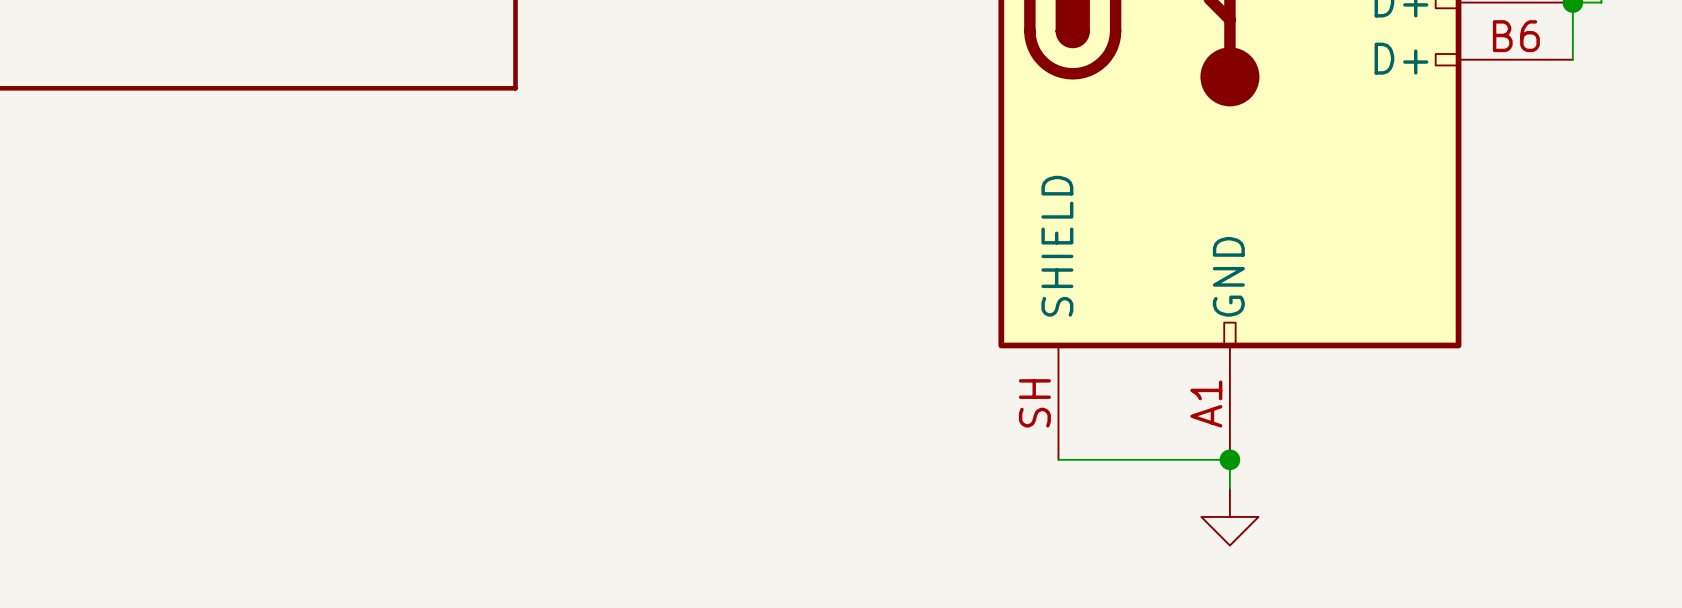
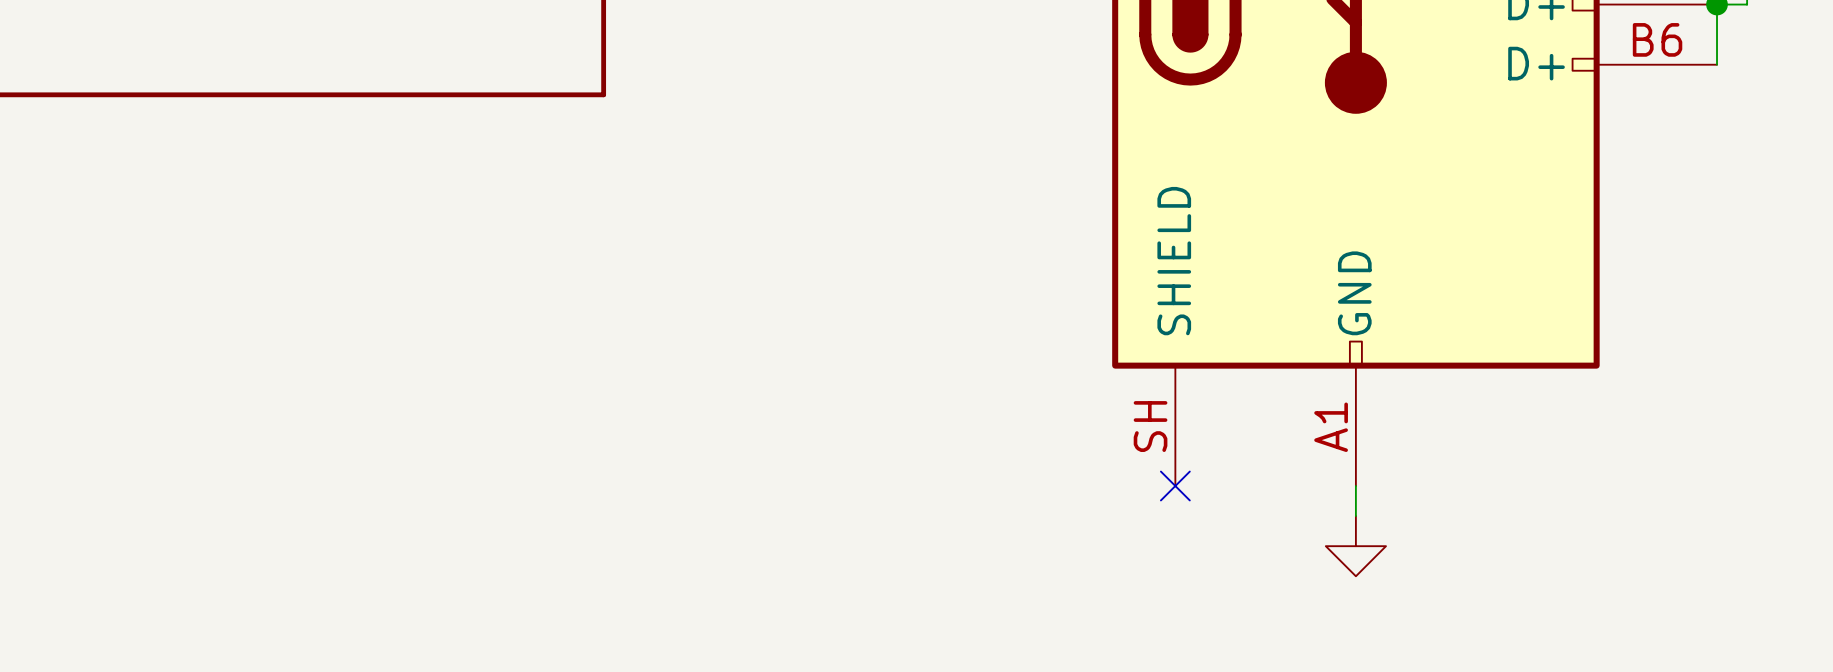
wire: (1058, 459) (1229, 459) -> none
no-connect mark: none -> (1175, 486)
junction: (1229, 459) -> none

